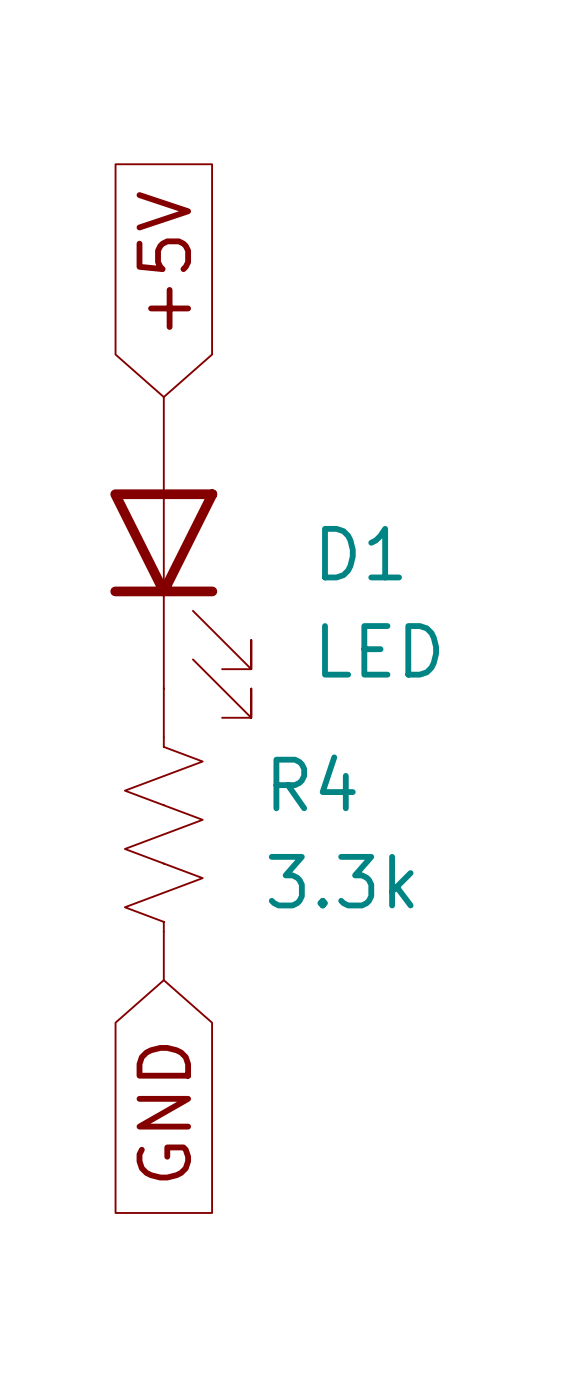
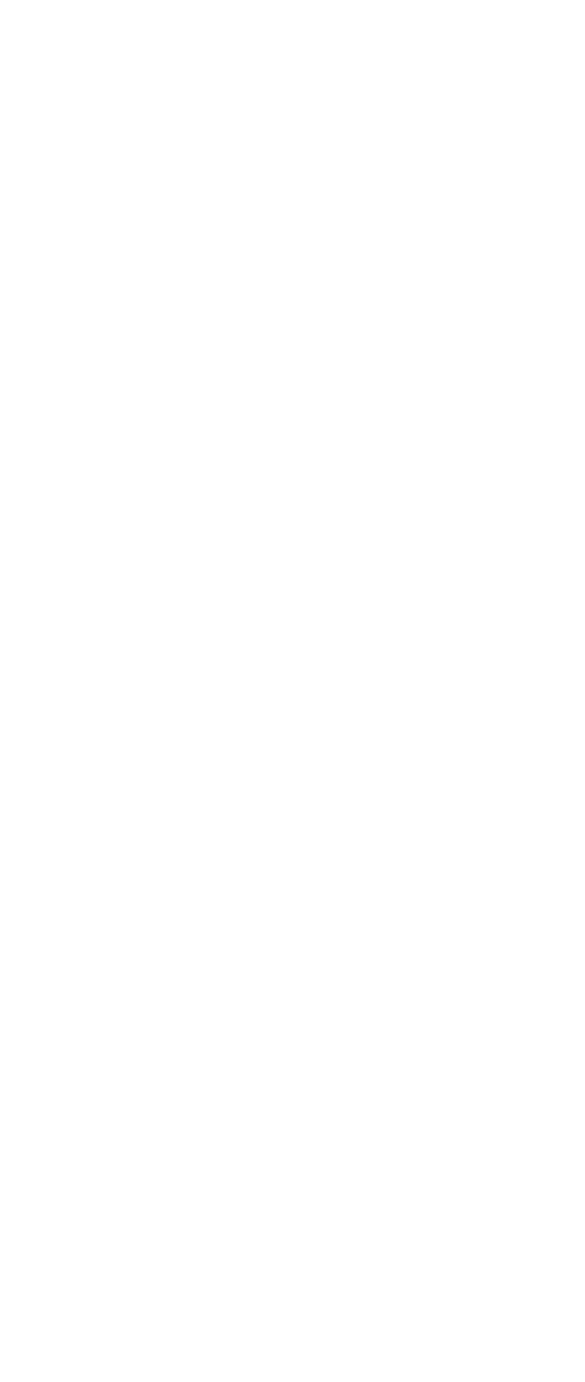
global label: +5V (163, 261) -> none
D1: LED (180, 557) -> none
R4: 3.3k (163, 834) -> none
global label: GND (163, 1112) -> none

